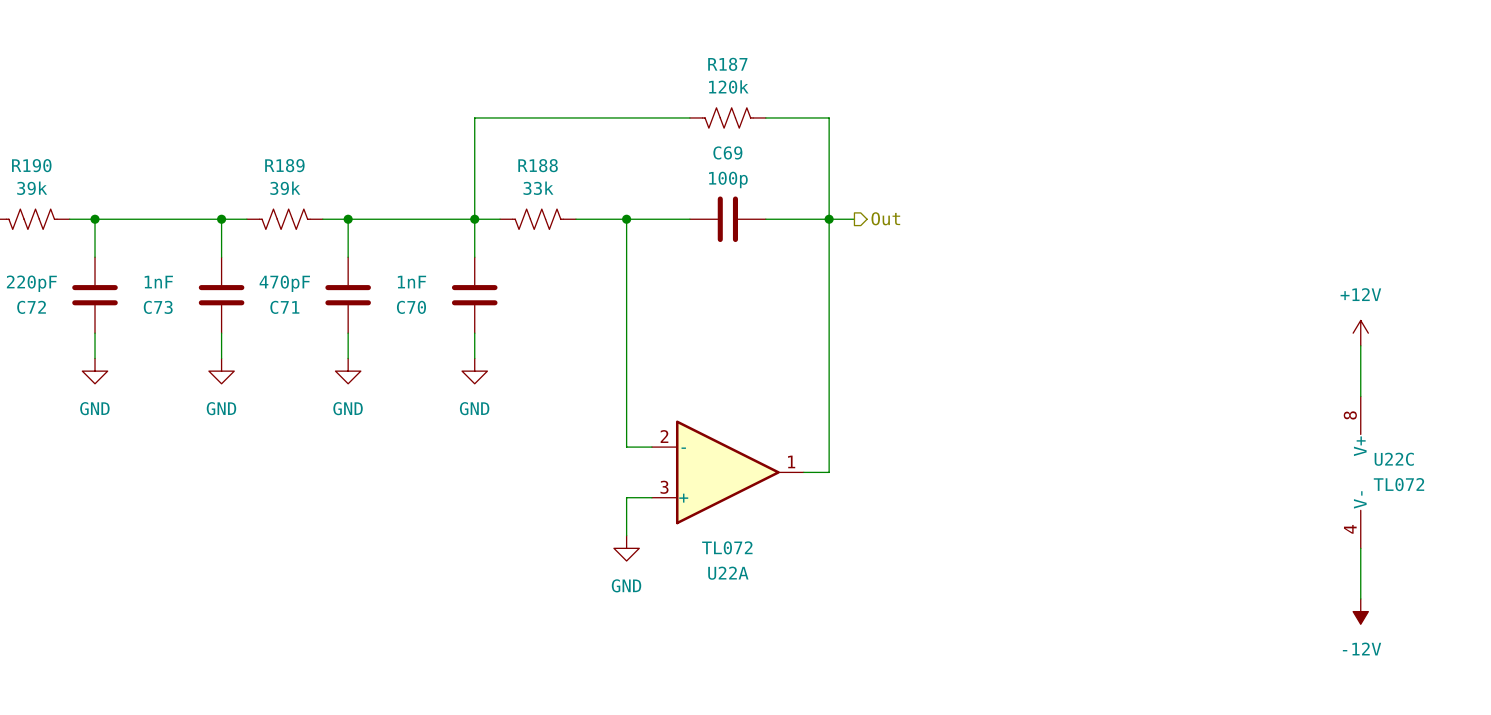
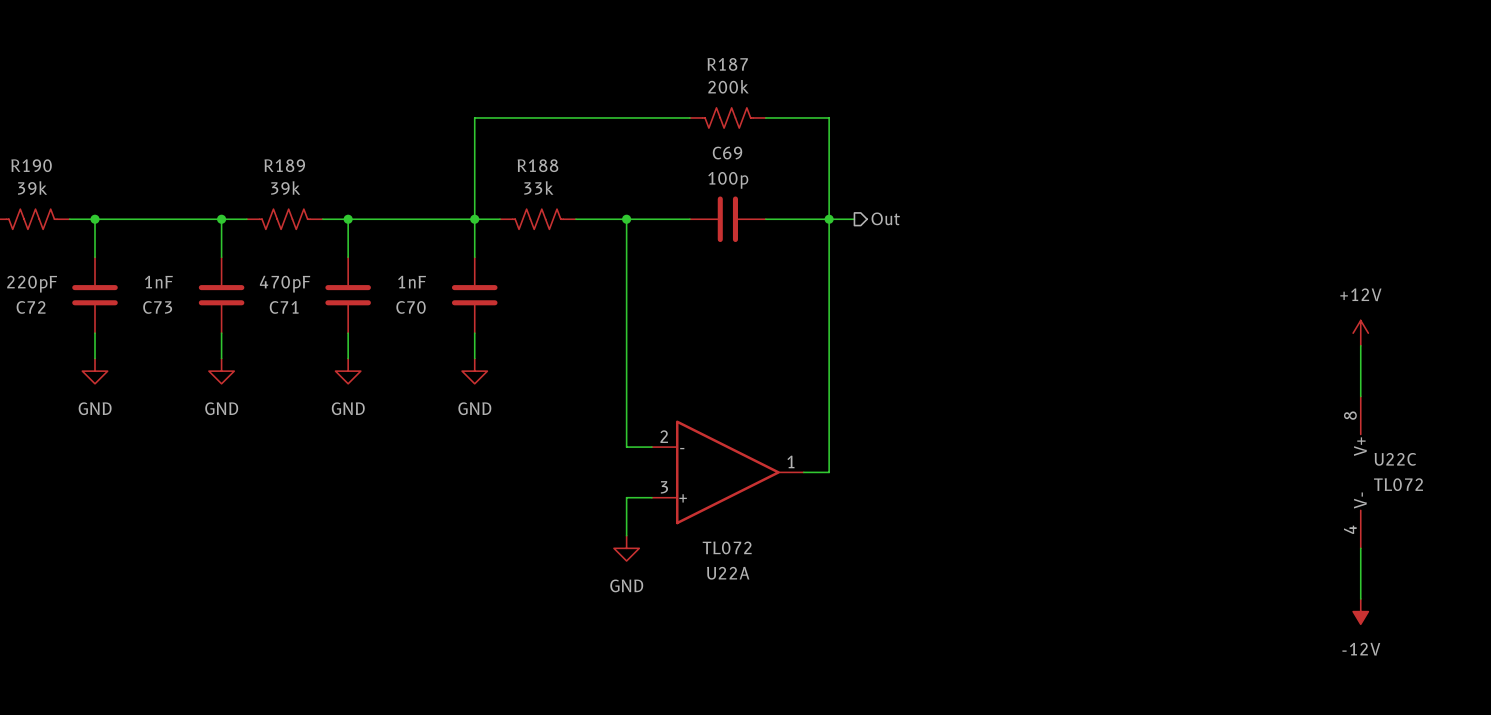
R187 value: 120k (728, 86) -> 200k (728, 86)

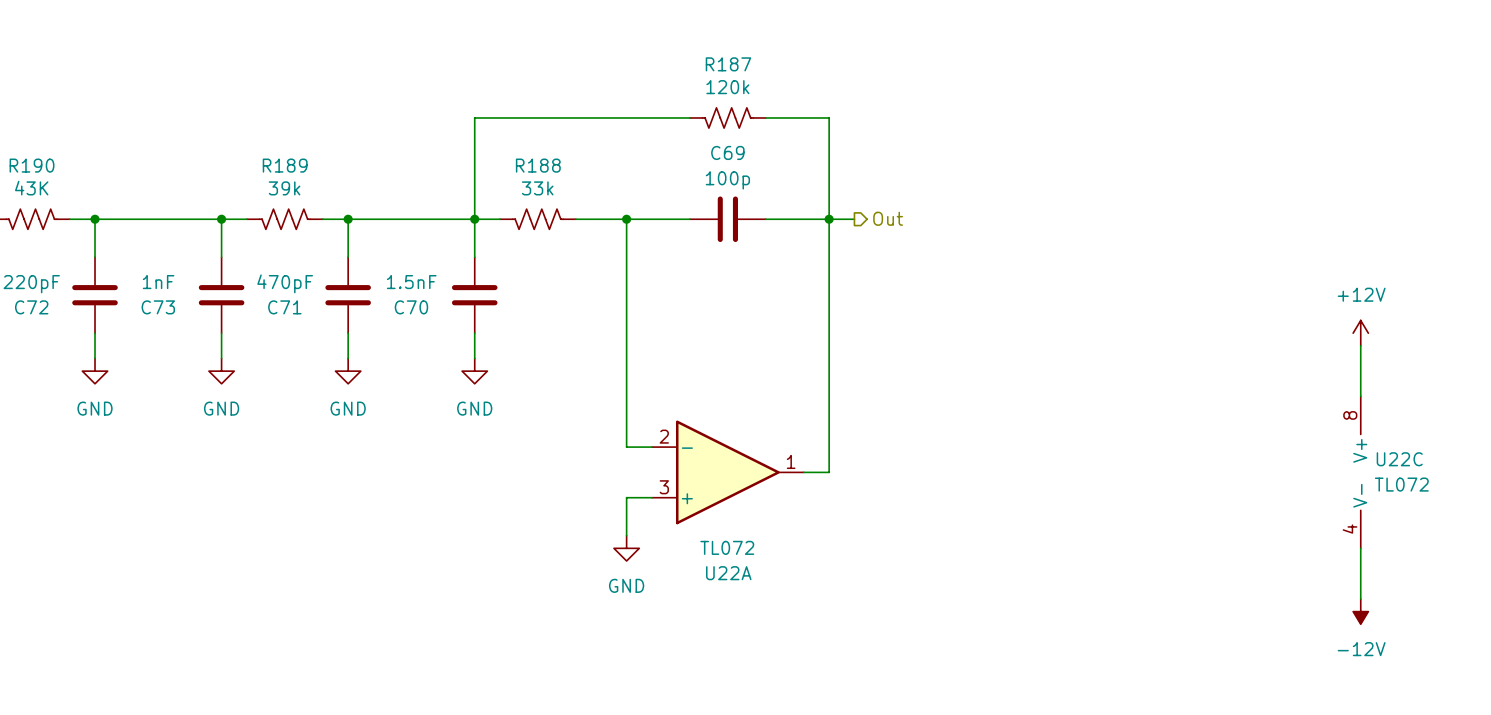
R187 value: 200k (728, 86) -> 120k (727, 87)
R190 value: 39k (32, 188) -> 43K (31, 188)
C70 value: 1nF (412, 282) -> 1.5nF (411, 282)

